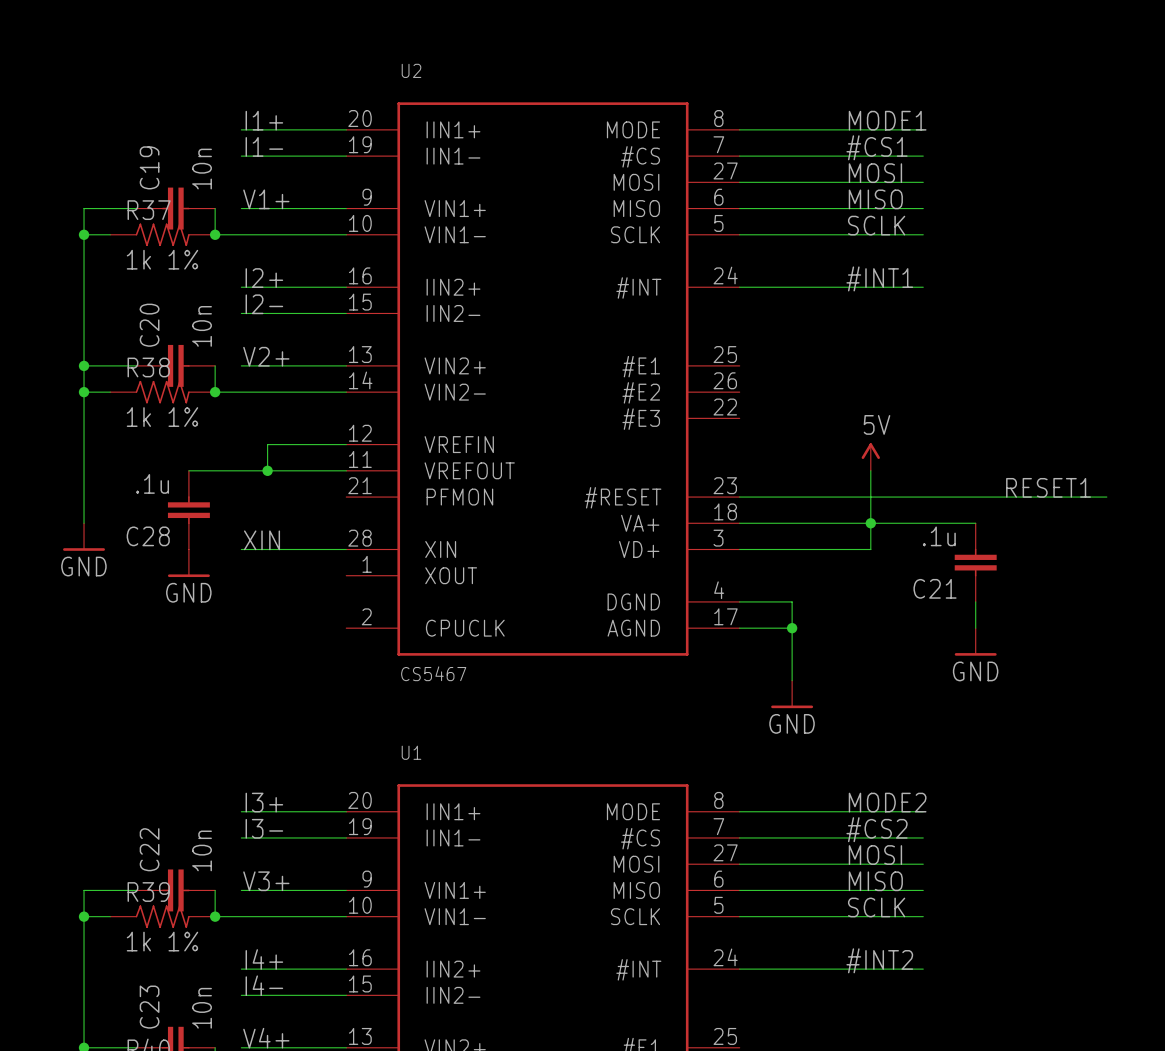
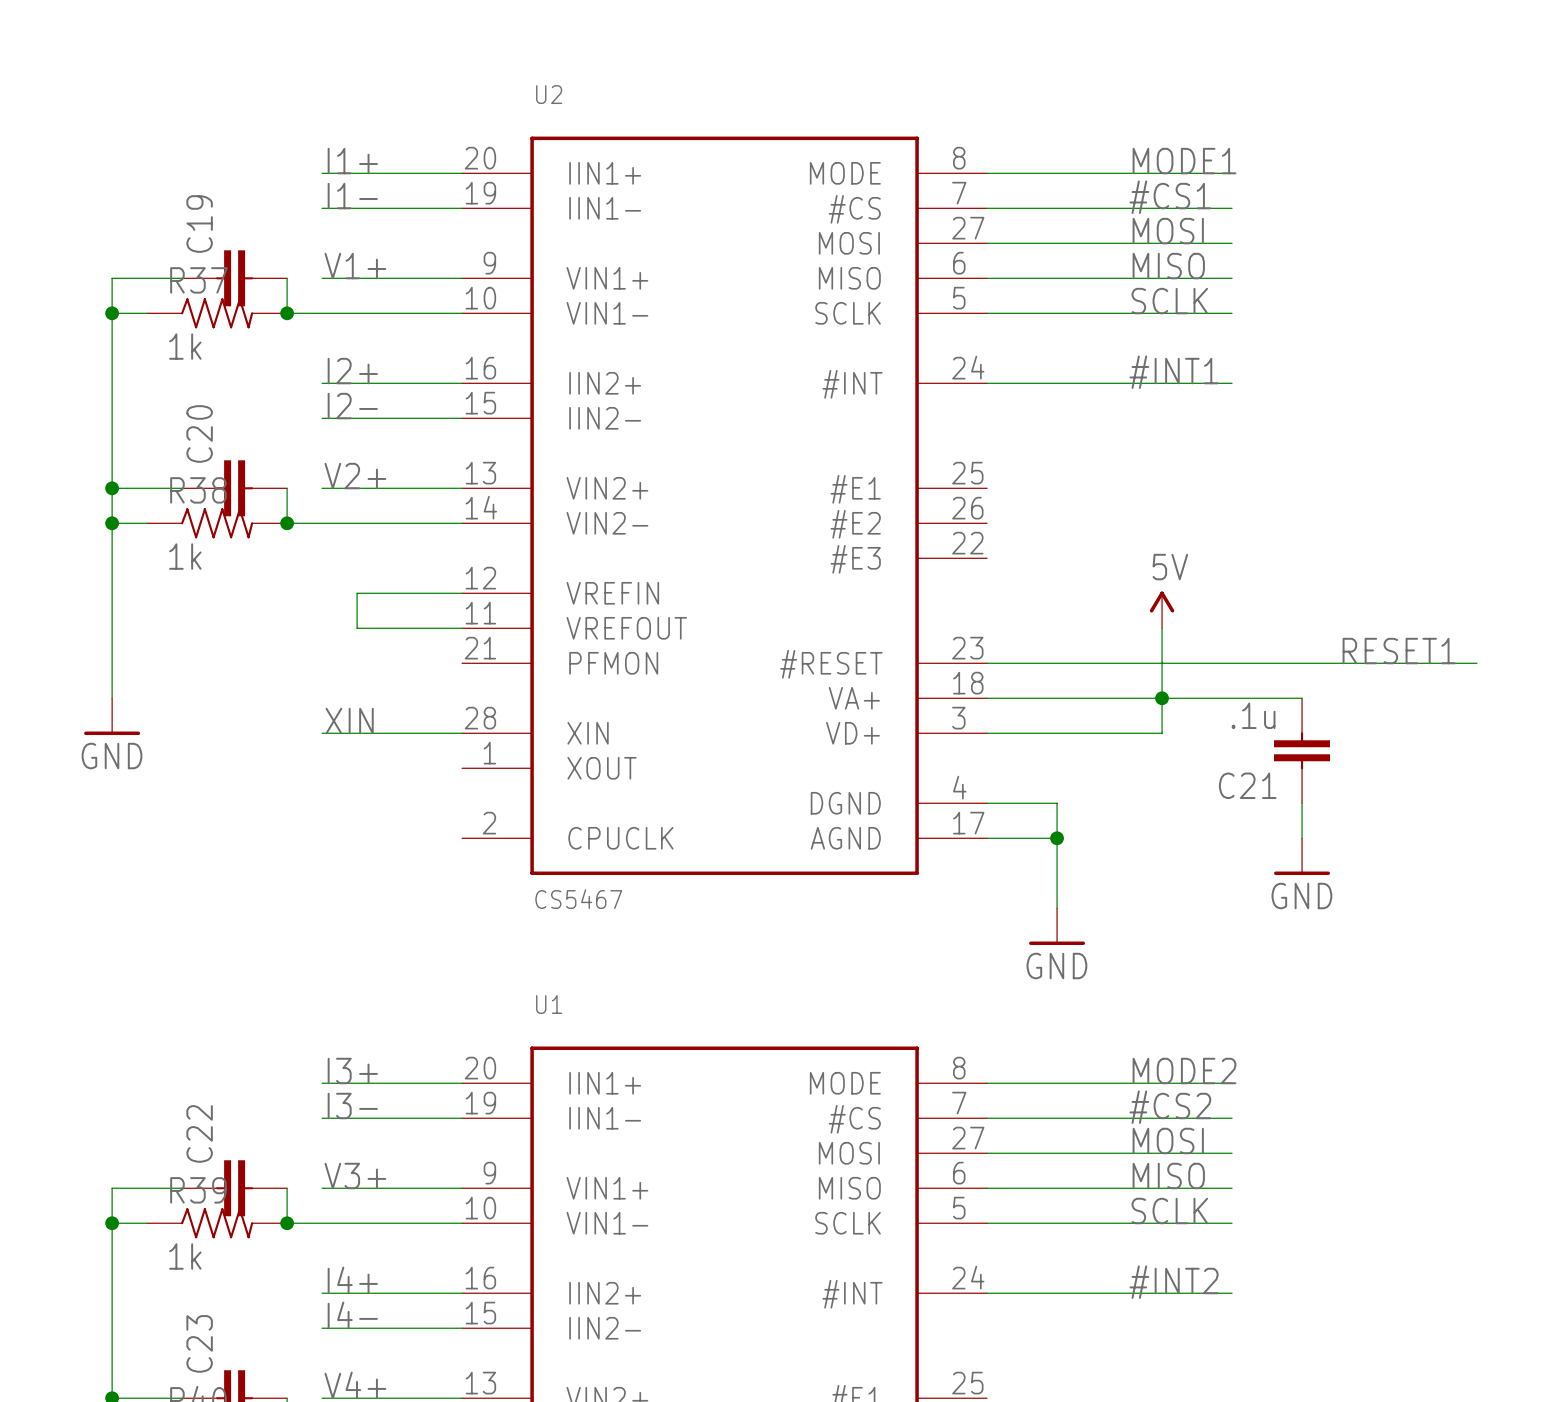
C19 value: 10n (202, 169) -> none
R37 value: 1k 1% (162, 259) -> 1k (185, 346)
C20 value: 10n (202, 326) -> none
R38 value: 1k 1% (162, 417) -> 1k (185, 556)
wire: (188, 470) (267, 470) -> none
junction: (267, 470) -> none
C28: .1u (188, 510) -> none
power symbol: GND (188, 563) -> none
C22 value: 10n (202, 850) -> none
R39 value: 1k 1% (162, 941) -> 1k (185, 1256)
C23 value: 10n (202, 1008) -> none

